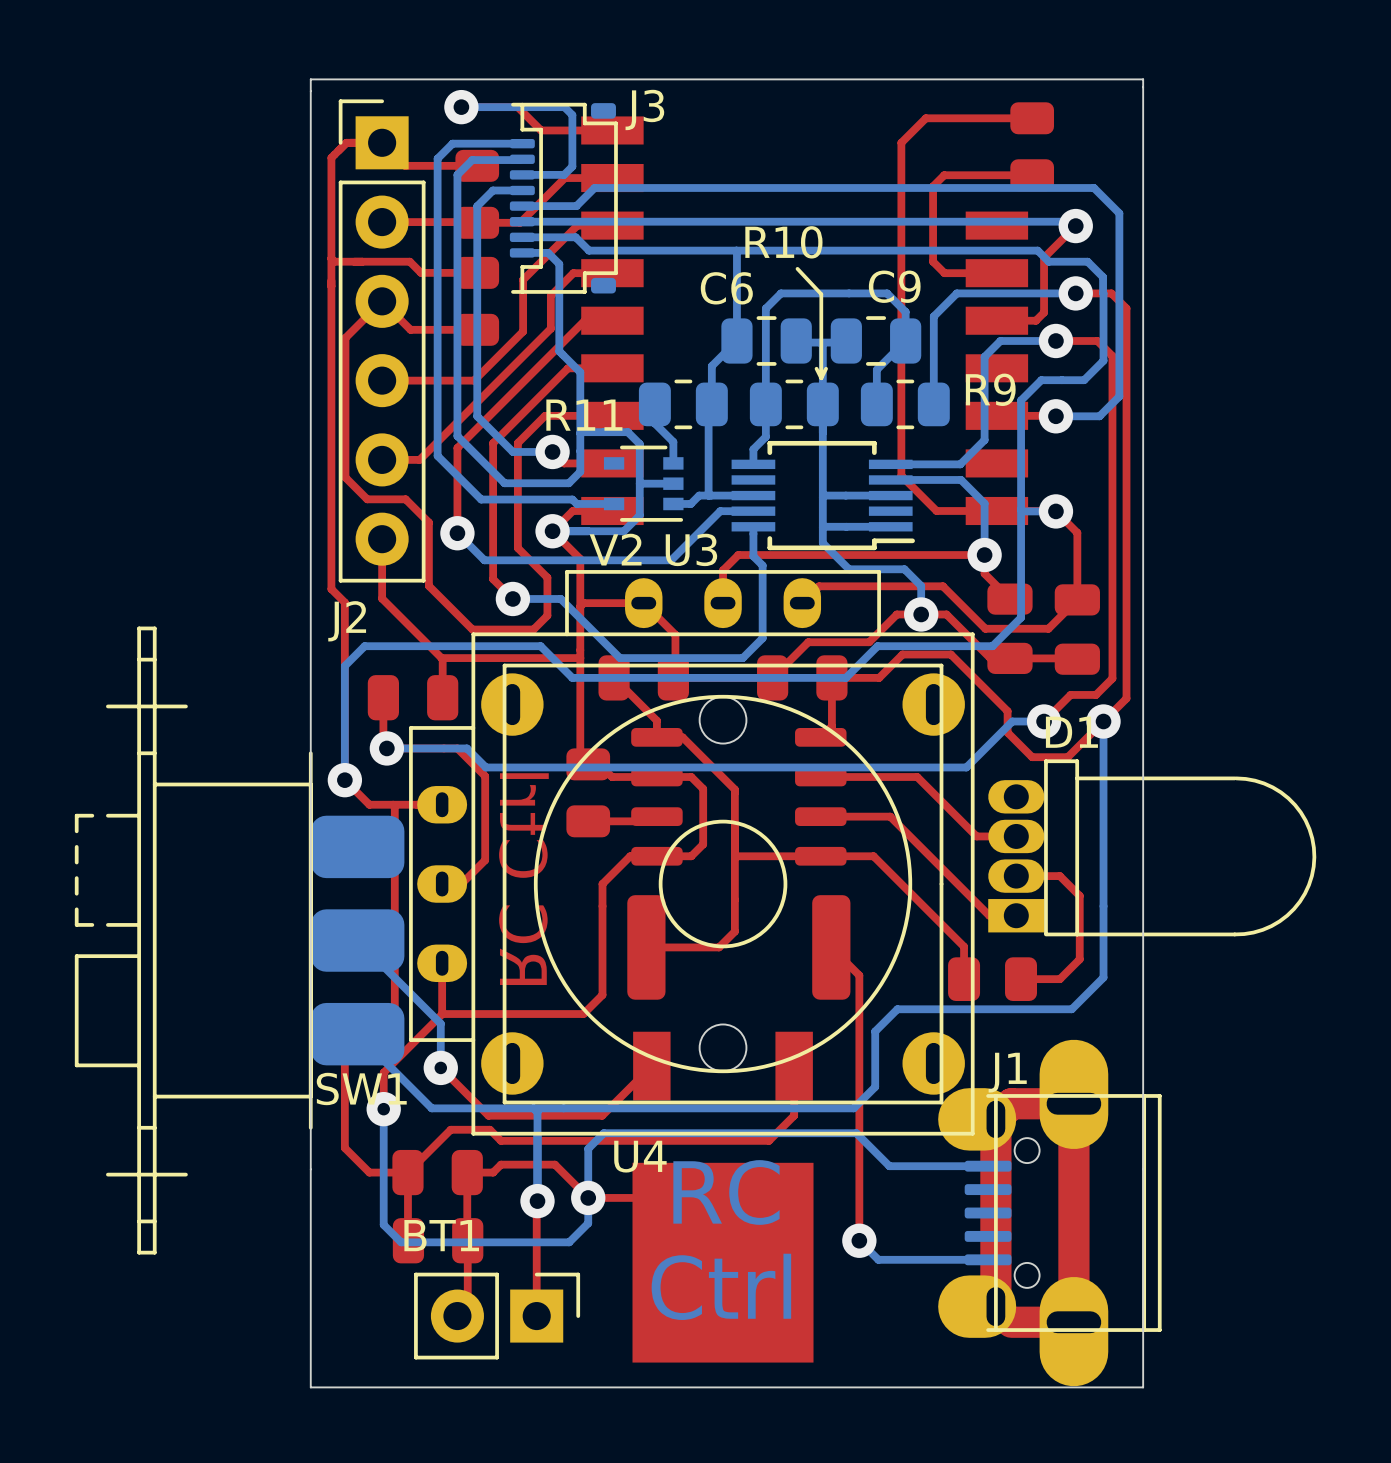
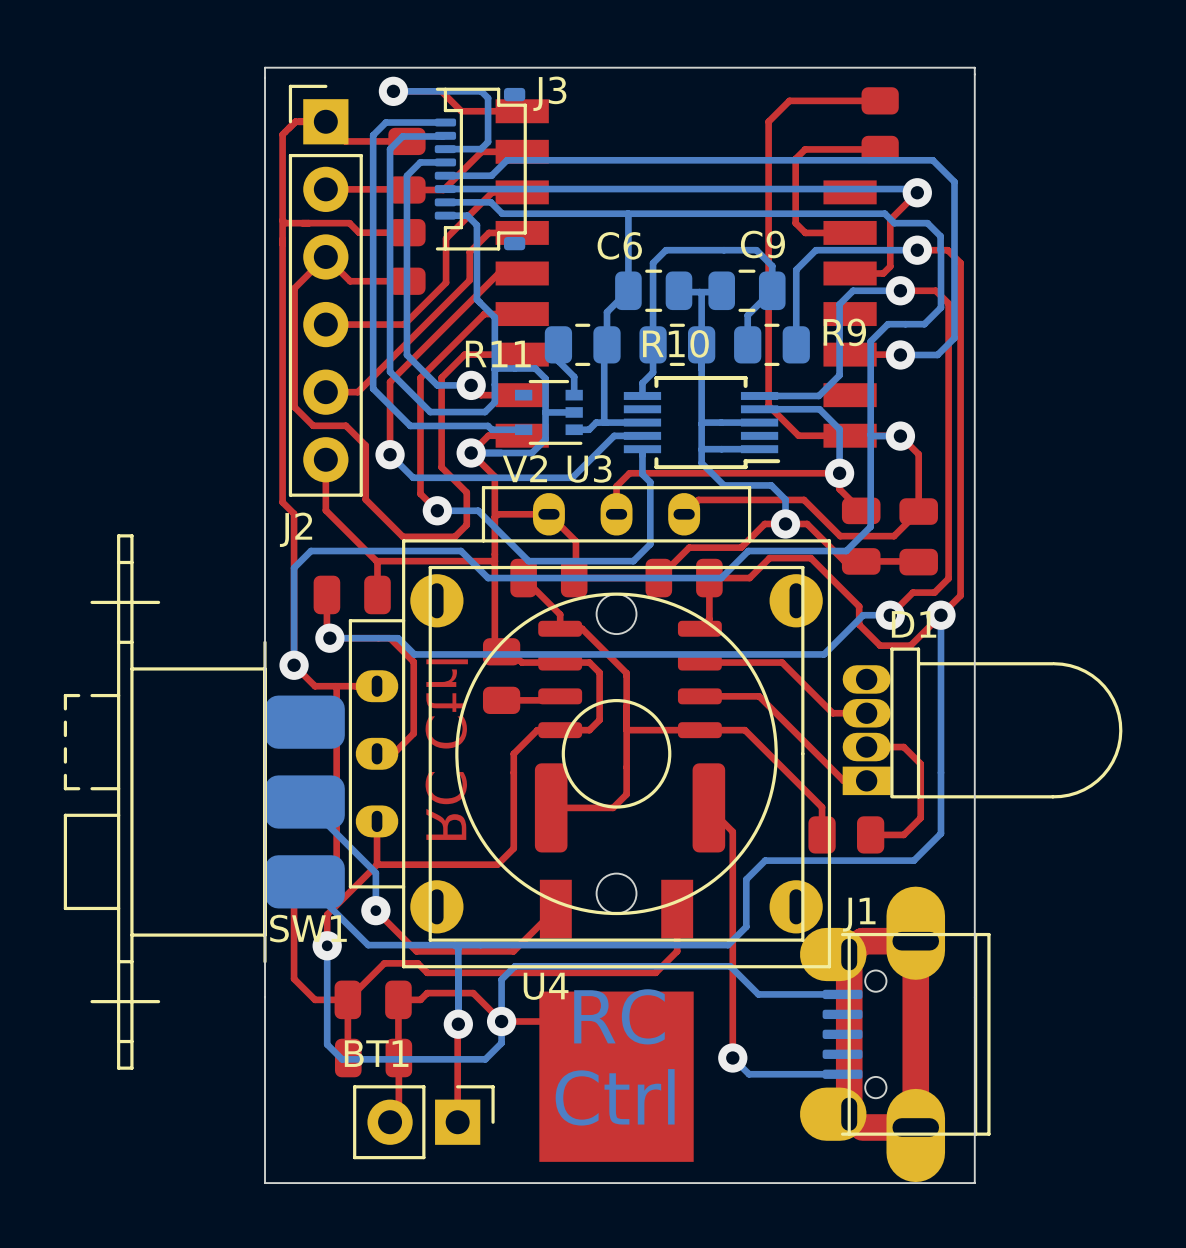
R10 name position: R10 (783, 242) -> R10 (675, 343)
line: (797, 268) (821, 294) (821, 378) -> none
line: (816, 368) (821, 378) -> none
line: (826, 368) (821, 378) -> none

